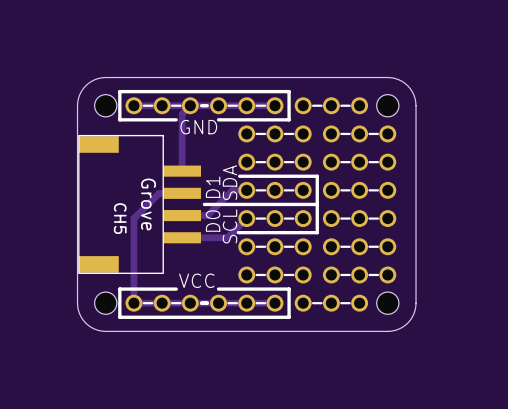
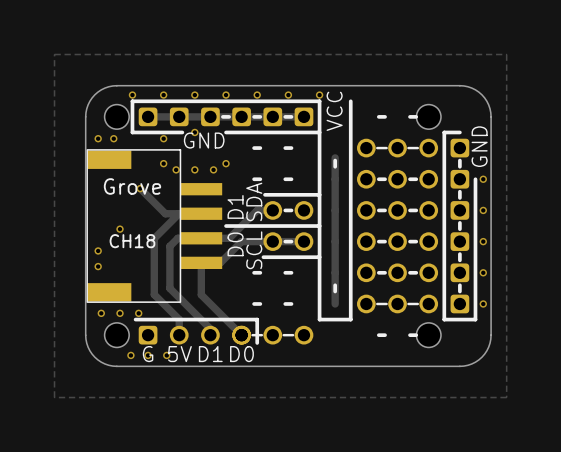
zone outline: none -> (54, 54) (506, 54) (506, 397) (54, 397) (54, 54)
board edge: (387, 77) (398, 79) (407, 85) (413, 94) (416, 105) (415, 306) (407, 323) (398, 329) (387, 331) -> (428, 85) (463, 85) (475, 89) (486, 101) (491, 116) (490, 343) (484, 354) (471, 363) (459, 366) (428, 366)
via: none -> (132, 95)
via: none -> (163, 95)
via: none -> (194, 95)
via: none -> (226, 95)
via: none -> (257, 95)
via: none -> (288, 95)
via: none -> (319, 95)
part footprint: [125, 97, 199, 115] -> [138, 107, 220, 127]
part footprint: [210, 97, 284, 115] -> [232, 107, 314, 127]
track: (190, 105) (182, 113) (182, 171) -> none
line: none -> (254, 116) (260, 116)
line: none -> (285, 116) (291, 116)
part: (331, 105) -> none
line: none -> (378, 116) (385, 116)
line: none -> (410, 116) (416, 116)
line: (164, 119) (176, 119) -> none
via: none -> (194, 132)
line: none -> (226, 132) (241, 132)
line: none -> (459, 132) (444, 132) (444, 319) (475, 319) (475, 179)
via: none -> (98, 138)
via: none -> (113, 138)
via: none -> (163, 138)
text position: GND (198, 127) -> GND (204, 140)
text: none -> GND (479, 146)
line: none -> (254, 148) (260, 148)
line: none -> (285, 148) (291, 148)
part: (274, 133) -> none
track: none -> (335, 157) (335, 303)
line: none -> (335, 160) (335, 166)
line: none -> (459, 160) (459, 166)
via: none -> (163, 163)
via: none -> (226, 163)
via: none -> (176, 169)
via: none -> (194, 169)
via: none -> (213, 169)
part footprint: [322, 153, 397, 171] -> [356, 169, 439, 189]
line: none -> (254, 179) (260, 179)
line: none -> (285, 179) (291, 179)
part: (274, 162) -> none
line: none -> (378, 179) (385, 179)
line: none -> (410, 179) (416, 179)
via: none -> (483, 179)
via: none -> (140, 188)
line: none -> (459, 191) (459, 197)
line: (289, 176) (317, 176) -> (350, 101) (350, 194)
part footprint: [322, 181, 397, 199] -> [356, 201, 439, 220]
line: none -> (285, 210) (291, 210)
part: none -> (288, 210)
part: (274, 190) -> none
line: none -> (378, 210) (385, 210)
line: none -> (410, 210) (416, 210)
via: none -> (483, 210)
track: (159, 193) (133, 218) (133, 303) (274, 303) -> (175, 213) (165, 213) (140, 188)
track: none -> (179, 213) (154, 238) (154, 294) (179, 319) (179, 335)
line: none -> (459, 222) (459, 229)
CH5 value rotation: 0° (148, 204) -> 90° counterclockwise (132, 186)
line: (289, 204) (317, 204) -> none
part: none -> (459, 226)
via: none -> (120, 229)
part footprint: [322, 210, 397, 228] -> [356, 232, 439, 251]
track: none -> (201, 238) (177, 238) (169, 246) (169, 288) (210, 328) (210, 335)
CH5 name: CH5 (120, 218) -> CH18 (132, 241)
track: (246, 218) (227, 237) (199, 237) -> (303, 241) (241, 241) (220, 262)
line: none -> (285, 241) (291, 241)
part: none -> (288, 241)
part: (274, 218) -> none
line: none -> (378, 241) (385, 241)
line: none -> (410, 241) (416, 241)
via: none -> (483, 241)
via: none -> (98, 250)
line: none -> (459, 254) (459, 260)
line: (289, 232) (317, 232) -> (319, 132) (319, 319) (350, 319) (350, 257)
track: none -> (201, 262) (201, 294) (241, 335)
part footprint: [322, 238, 397, 256] -> [356, 263, 439, 283]
via: none -> (98, 266)
line: none -> (254, 272) (260, 272)
line: none -> (285, 272) (291, 272)
part: (274, 246) -> none
line: none -> (378, 272) (385, 272)
line: none -> (410, 272) (416, 272)
via: none -> (483, 272)
line: none -> (335, 285) (335, 291)
line: none -> (459, 285) (459, 291)
line: none -> (285, 303) (291, 303)
part: (274, 274) -> none
via: none -> (483, 303)
text rotation: 0° (196, 280) -> 90° counterclockwise (334, 111)
text position: VCC (196, 280) -> VCC (334, 111)
via: none -> (101, 313)
via: none -> (120, 313)
via: none -> (138, 313)
line: (122, 289) (119, 289) (119, 317) (289, 317) (289, 289) (232, 289) -> (257, 342) (257, 319)
line: none -> (194, 319) (241, 319)
part: (162, 303) -> none
part: none -> (194, 335)
line: (201, 303) (207, 303) -> (254, 303) (260, 303)
part: (331, 303) -> none
line: none -> (378, 335) (385, 335)
line: none -> (410, 335) (416, 335)
text: none -> G (148, 354)
text: none -> 5V (179, 354)
text: none -> D1 (210, 354)
text: none -> D0 (241, 354)
via: none -> (130, 355)
via: none -> (148, 355)
via: none -> (166, 355)

